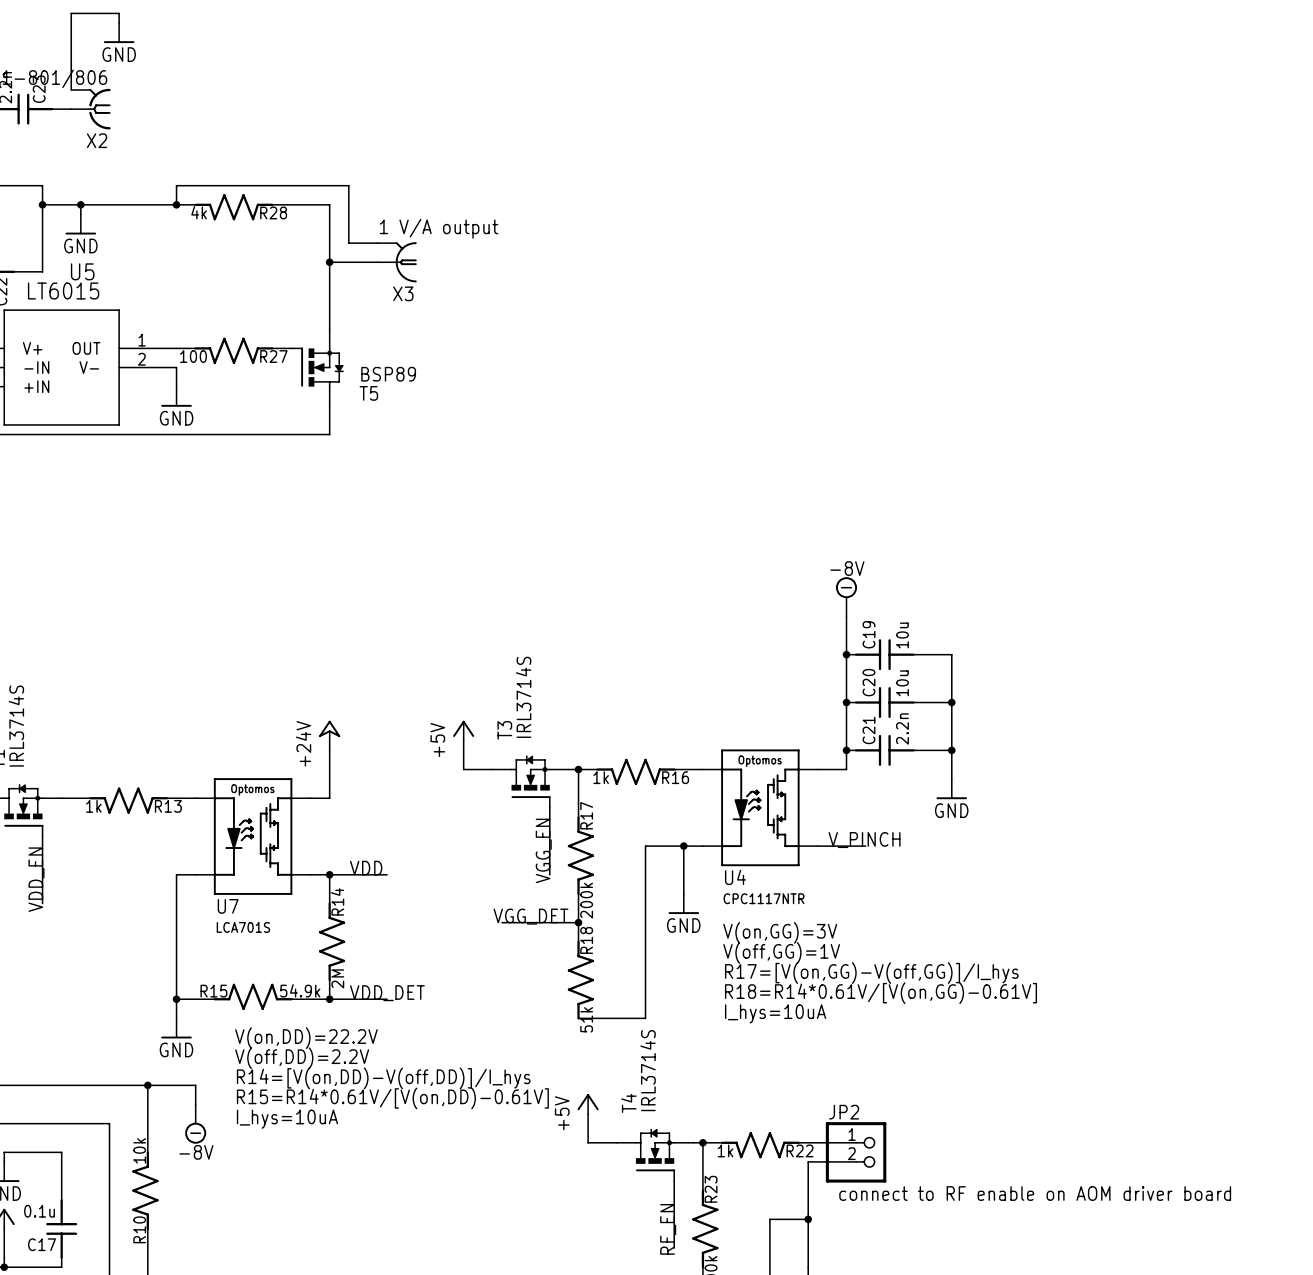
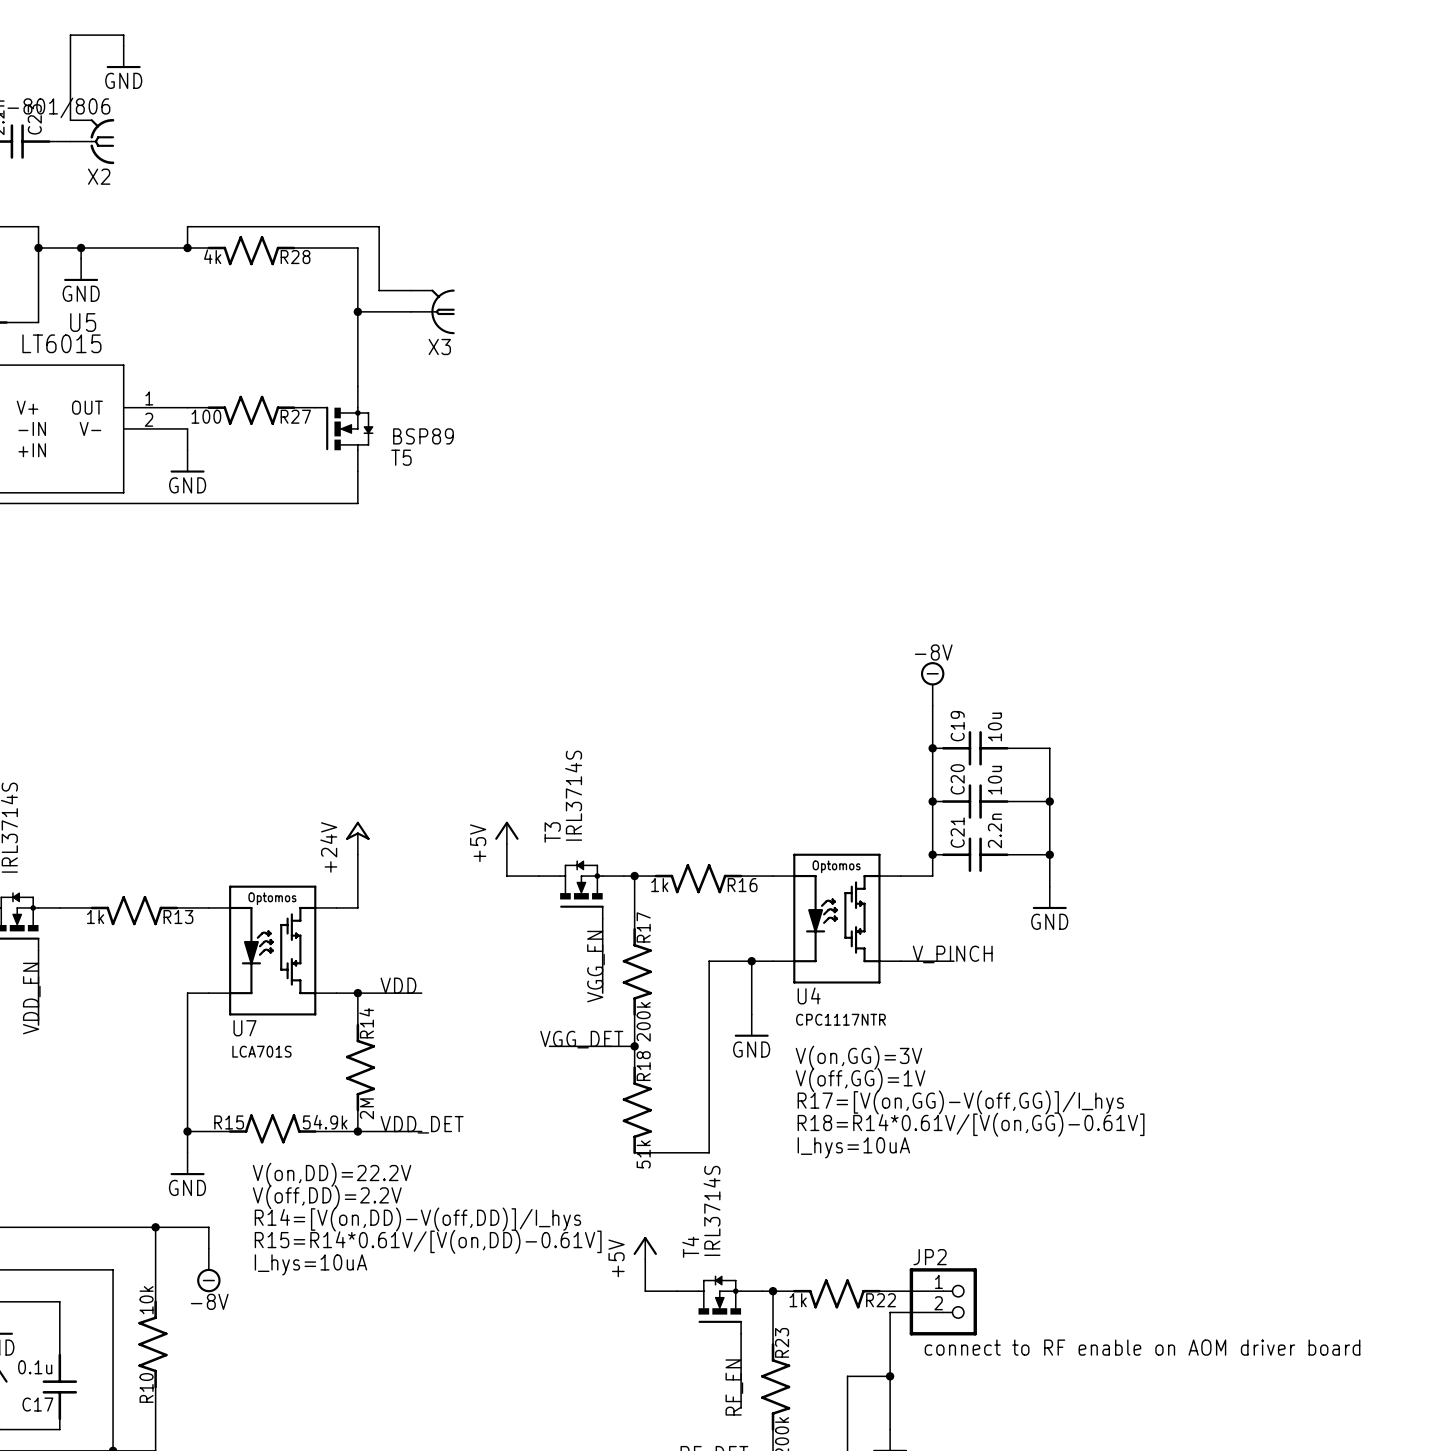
text: 1 V/A output (439, 228) -> none

